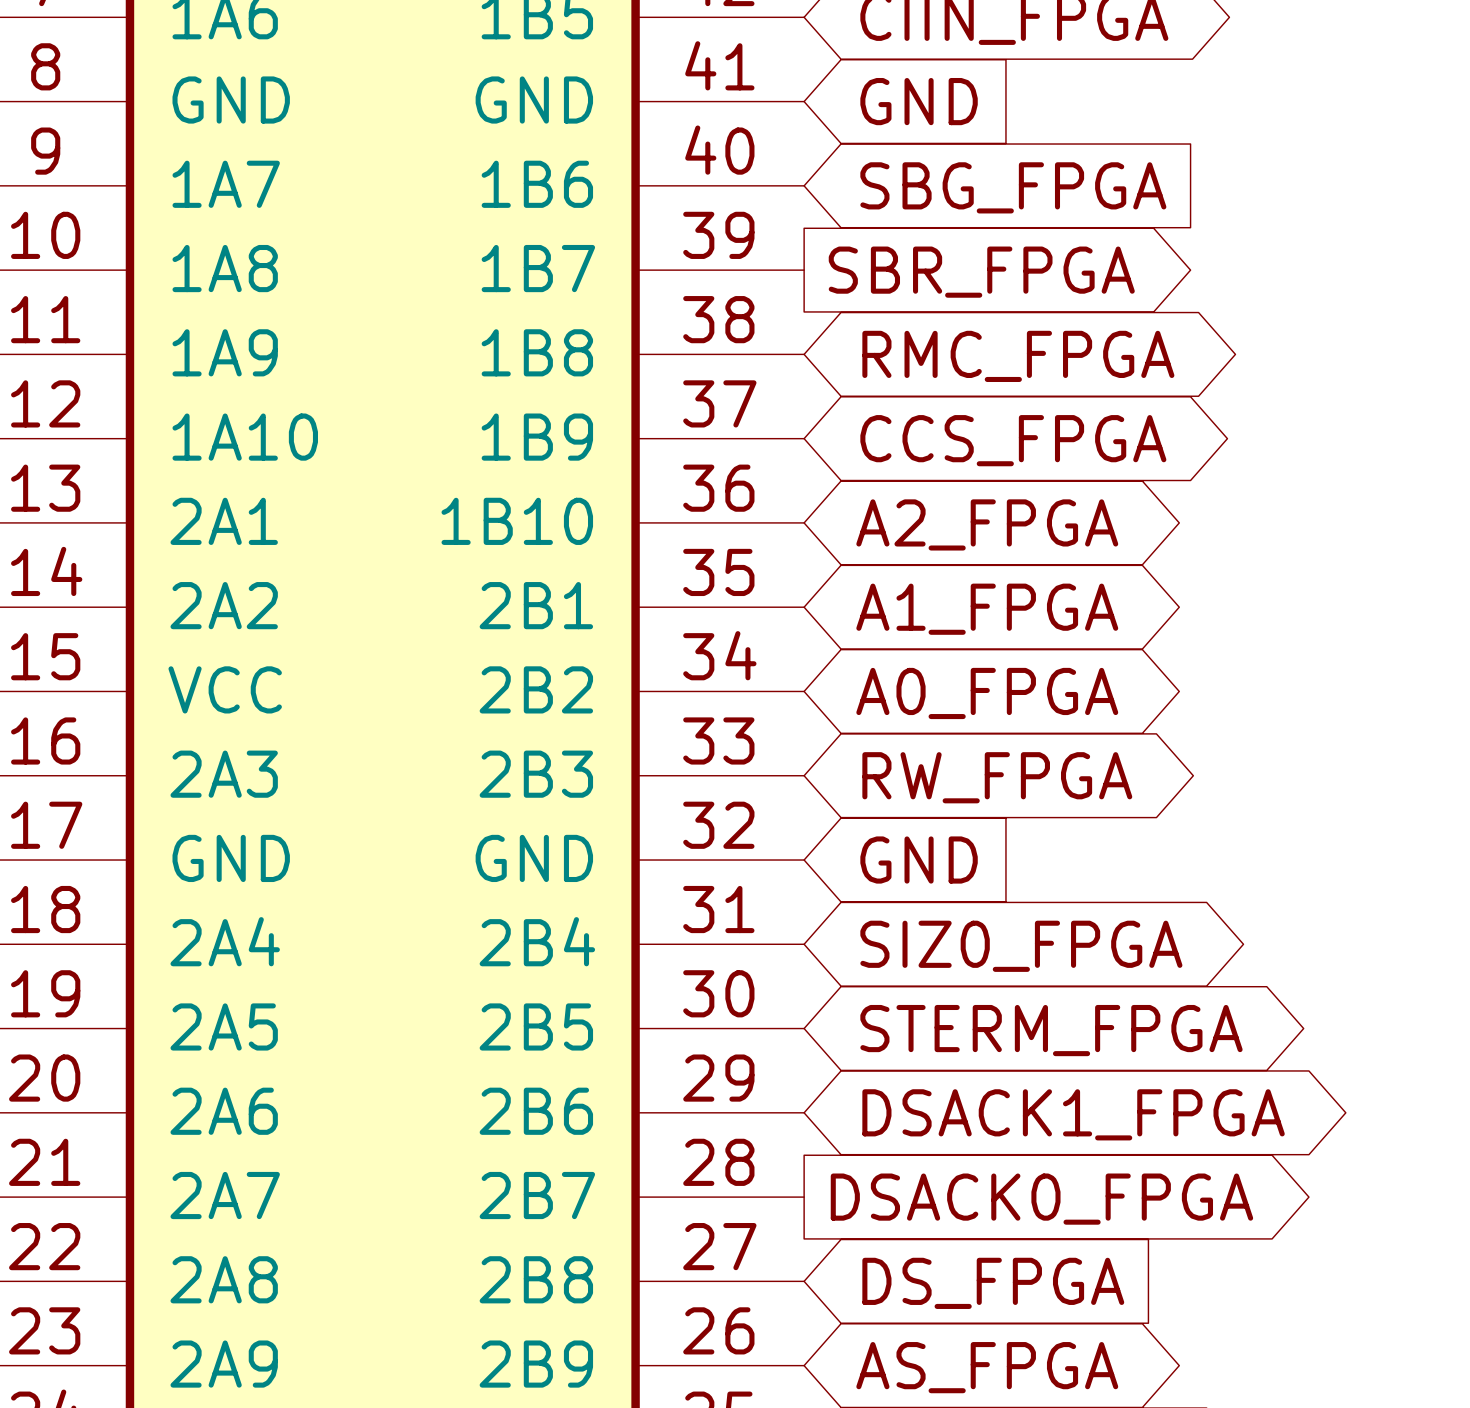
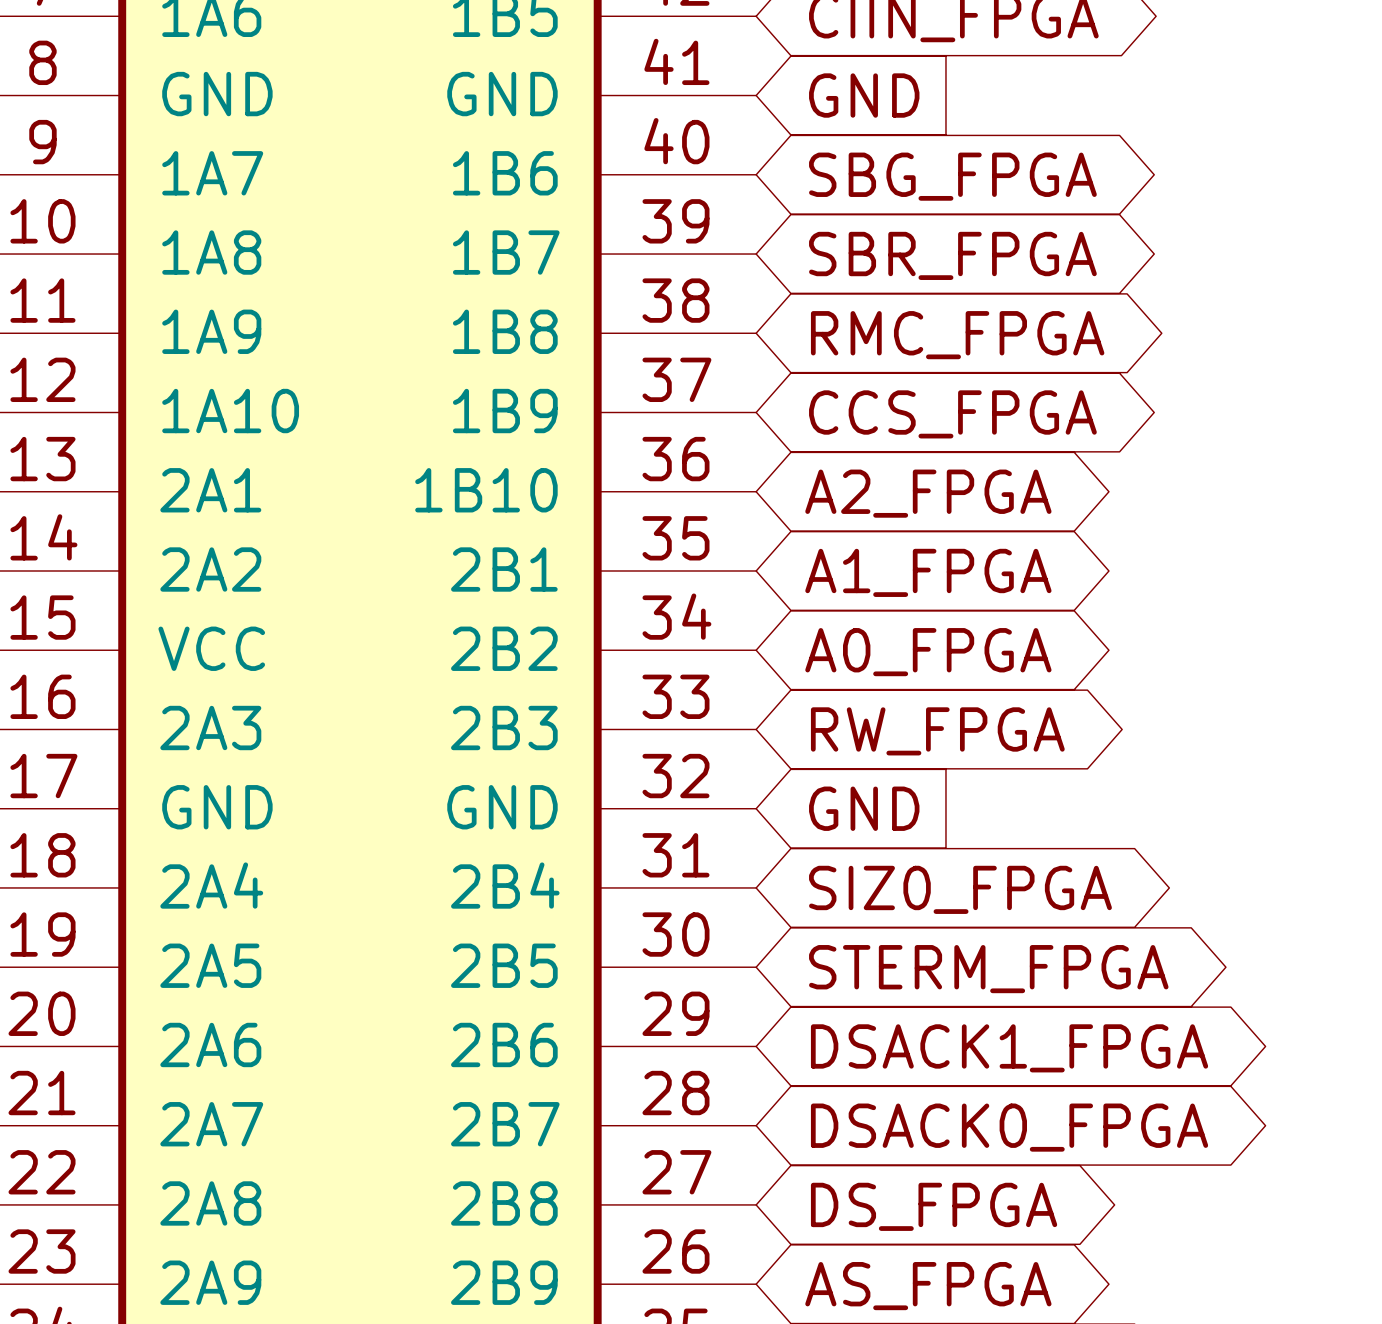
global label shape: input (1013, 187) -> bidirectional (952, 176)
global label shape: output (981, 272) -> bidirectional (952, 255)
global label shape: output (1041, 1199) -> bidirectional (1009, 1127)
global label shape: input (993, 1283) -> bidirectional (934, 1206)

